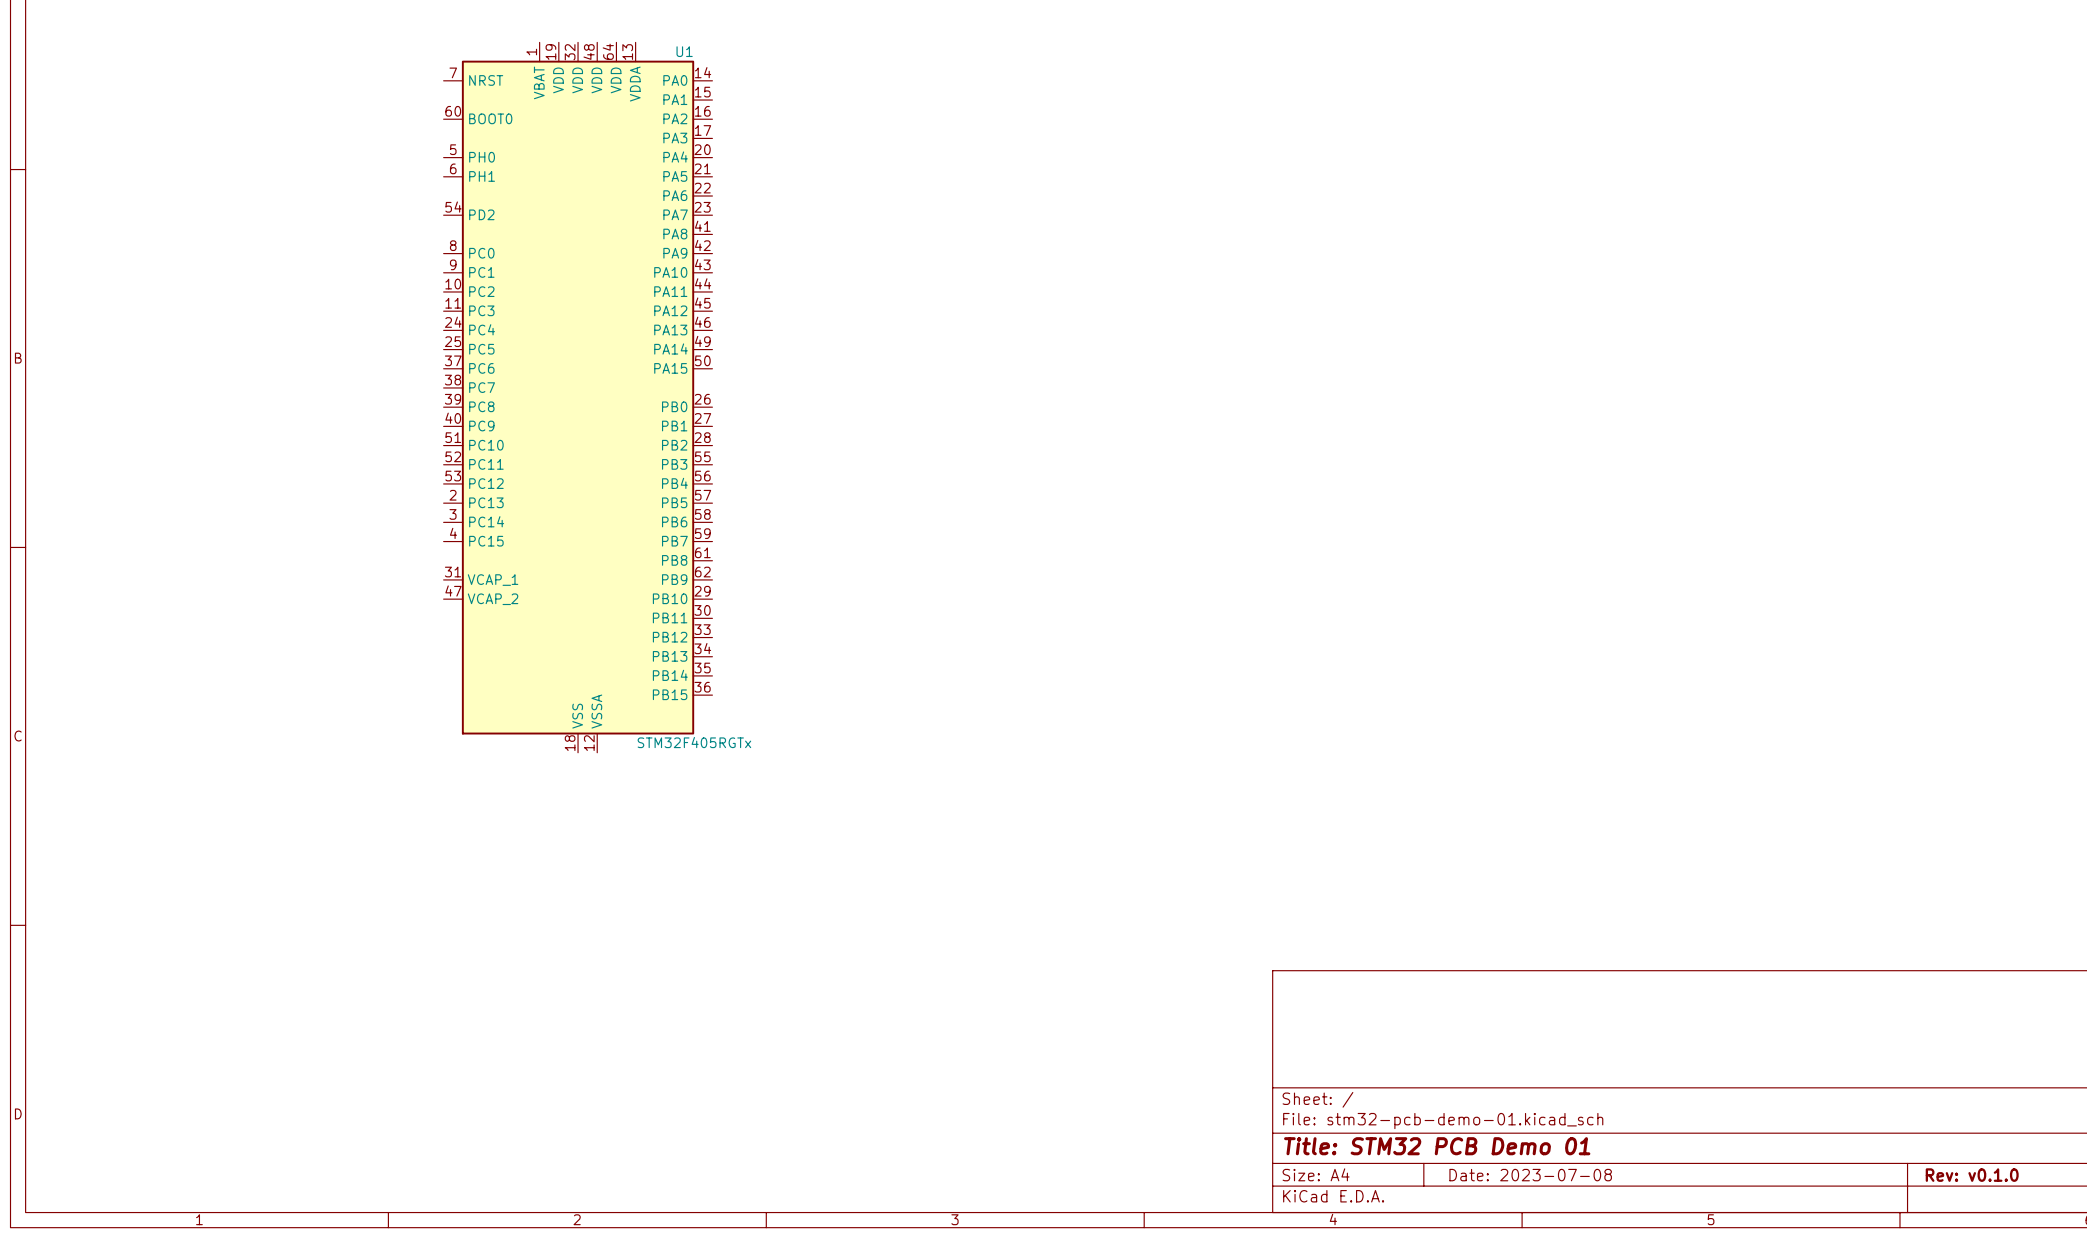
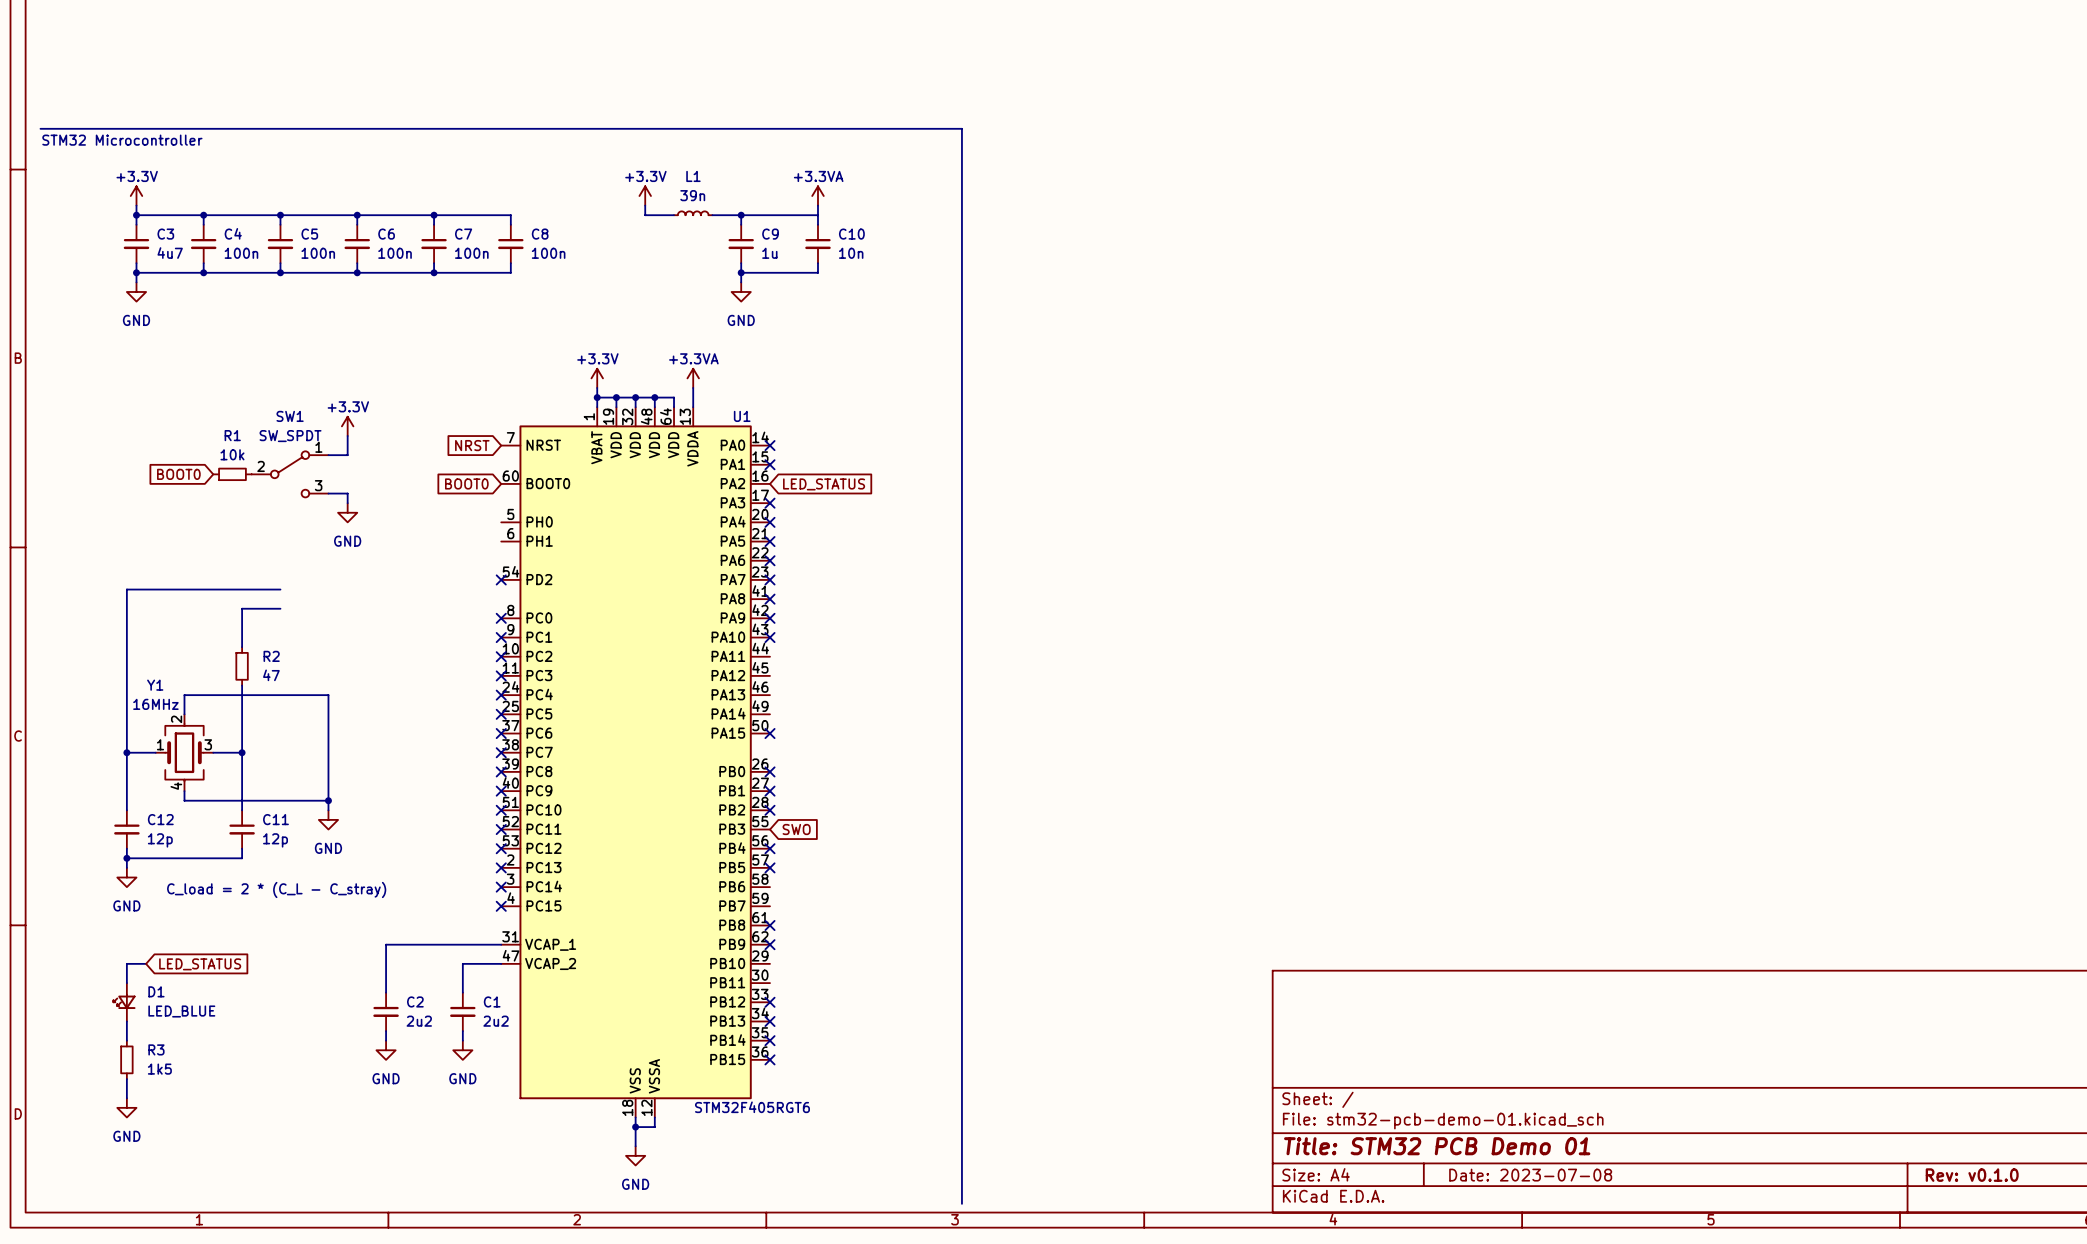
line: none -> (40, 128) (961, 128) (961, 1203)
text: none -> STM32 Microcontroller (122, 140)
power symbol: none -> +3.3V (136, 196)
power symbol: none -> +3.3V (645, 196)
power symbol: none -> +3.3VA (817, 196)
wire: none -> (136, 205) (136, 224)
wire: none -> (817, 205) (817, 224)
L1: none -> 39n (693, 213)
wire: none -> (136, 215) (510, 215) (510, 224)
junction: none -> (136, 215)
wire: none -> (203, 215) (203, 224)
junction: none -> (203, 215)
wire: none -> (280, 215) (280, 224)
junction: none -> (280, 215)
wire: none -> (357, 215) (357, 224)
junction: none -> (357, 215)
wire: none -> (434, 215) (434, 224)
junction: none -> (434, 215)
wire: none -> (712, 215) (817, 215)
wire: none -> (741, 215) (741, 224)
junction: none -> (741, 215)
C3: none -> 4u7 (136, 244)
C4: none -> 100n (203, 244)
C5: none -> 100n (280, 244)
C6: none -> 100n (357, 244)
C7: none -> 100n (434, 244)
C8: none -> 100n (510, 244)
C9: none -> 1u (741, 244)
C10: none -> 10n (817, 244)
wire: none -> (136, 263) (136, 282)
wire: none -> (203, 263) (203, 272)
wire: none -> (280, 263) (280, 272)
wire: none -> (357, 263) (357, 272)
wire: none -> (434, 263) (434, 272)
wire: none -> (510, 263) (510, 272) (136, 272)
wire: none -> (741, 263) (741, 282)
wire: none -> (817, 263) (817, 272) (741, 272)
junction: none -> (136, 272)
junction: none -> (203, 272)
junction: none -> (280, 272)
junction: none -> (357, 272)
junction: none -> (434, 272)
junction: none -> (741, 272)
power symbol: none -> GND (136, 291)
power symbol: none -> GND (741, 291)
power symbol: none -> +3.3V (597, 378)
power symbol: none -> +3.3VA (693, 378)
U1 position: (578, 397) -> (635, 762)
junction: none -> (597, 397)
junction: none -> (616, 397)
junction: none -> (635, 397)
junction: none -> (654, 397)
power symbol: none -> +3.3V (347, 426)
wire: none -> (347, 435) (347, 455) (328, 455)
global label: none -> NRST (472, 445)
no-connect mark: none -> (770, 445)
no-connect mark: none -> (770, 464)
global label: none -> BOOT0 (178, 474)
R1: none -> 10k (232, 474)
SW1: none -> SW_SPDT (290, 474)
global label: none -> BOOT0 (466, 483)
global label: none -> LED_STATUS (824, 484)
wire: none -> (328, 493) (347, 493) (347, 503)
no-connect mark: none -> (770, 503)
power symbol: none -> GND (347, 512)
no-connect mark: none -> (770, 522)
no-connect mark: none -> (770, 541)
no-connect mark: none -> (770, 560)
no-connect mark: none -> (501, 579)
no-connect mark: none -> (770, 579)
wire: none -> (280, 589) (126, 589) (126, 810)
no-connect mark: none -> (770, 599)
wire: none -> (280, 608) (242, 608) (242, 647)
no-connect mark: none -> (501, 618)
no-connect mark: none -> (770, 618)
no-connect mark: none -> (501, 637)
no-connect mark: none -> (770, 637)
no-connect mark: none -> (501, 656)
R2: none -> 47 (242, 666)
no-connect mark: none -> (501, 675)
wire: none -> (242, 685) (242, 810)
no-connect mark: none -> (501, 695)
wire: none -> (184, 714) (184, 695) (328, 695) (328, 810)
no-connect mark: none -> (501, 714)
no-connect mark: none -> (501, 733)
no-connect mark: none -> (770, 733)
U1 value: STM32F405RGTx (694, 742) -> STM32F405RGT6 (752, 1107)
wire: none -> (126, 752) (155, 752)
junction: none -> (126, 752)
Y1: none -> 16MHz (184, 752)
wire: none -> (213, 752) (242, 752)
junction: none -> (242, 752)
no-connect mark: none -> (501, 752)
no-connect mark: none -> (501, 771)
no-connect mark: none -> (770, 771)
wire: none -> (184, 791) (184, 800) (328, 800)
no-connect mark: none -> (501, 791)
no-connect mark: none -> (770, 791)
junction: none -> (328, 800)
no-connect mark: none -> (501, 810)
no-connect mark: none -> (770, 810)
power symbol: none -> GND (328, 819)
C12: none -> 12p (126, 829)
C11: none -> 12p (242, 829)
no-connect mark: none -> (501, 829)
global label: none -> SWO (796, 829)
wire: none -> (126, 848) (126, 867)
wire: none -> (242, 848) (242, 858) (126, 858)
no-connect mark: none -> (501, 848)
no-connect mark: none -> (770, 848)
junction: none -> (126, 858)
no-connect mark: none -> (501, 867)
no-connect mark: none -> (770, 867)
power symbol: none -> GND (126, 877)
no-connect mark: none -> (501, 887)
text: none -> C_load = 2 * (C_L - C_stray) (276, 889)
no-connect mark: none -> (501, 906)
no-connect mark: none -> (770, 925)
wire: none -> (501, 944) (386, 944) (386, 992)
no-connect mark: none -> (770, 944)
wire: none -> (146, 963) (126, 963) (126, 983)
wire: none -> (501, 963) (462, 963) (462, 992)
global label: none -> LED_STATUS (200, 964)
D1: none -> LED_BLUE (124, 1002)
no-connect mark: none -> (770, 1002)
C2: none -> 2u2 (386, 1011)
C1: none -> 2u2 (462, 1011)
wire: none -> (126, 1021) (126, 1040)
no-connect mark: none -> (770, 1021)
wire: none -> (386, 1031) (386, 1040)
wire: none -> (462, 1031) (462, 1040)
no-connect mark: none -> (770, 1040)
power symbol: none -> GND (386, 1050)
power symbol: none -> GND (462, 1050)
R3: none -> 1k5 (126, 1059)
no-connect mark: none -> (770, 1059)
wire: none -> (126, 1079) (126, 1098)
power symbol: none -> GND (126, 1107)
wire: none -> (635, 1117) (635, 1146)
wire: none -> (654, 1117) (654, 1127) (635, 1127)
junction: none -> (635, 1127)
power symbol: none -> GND (635, 1155)

